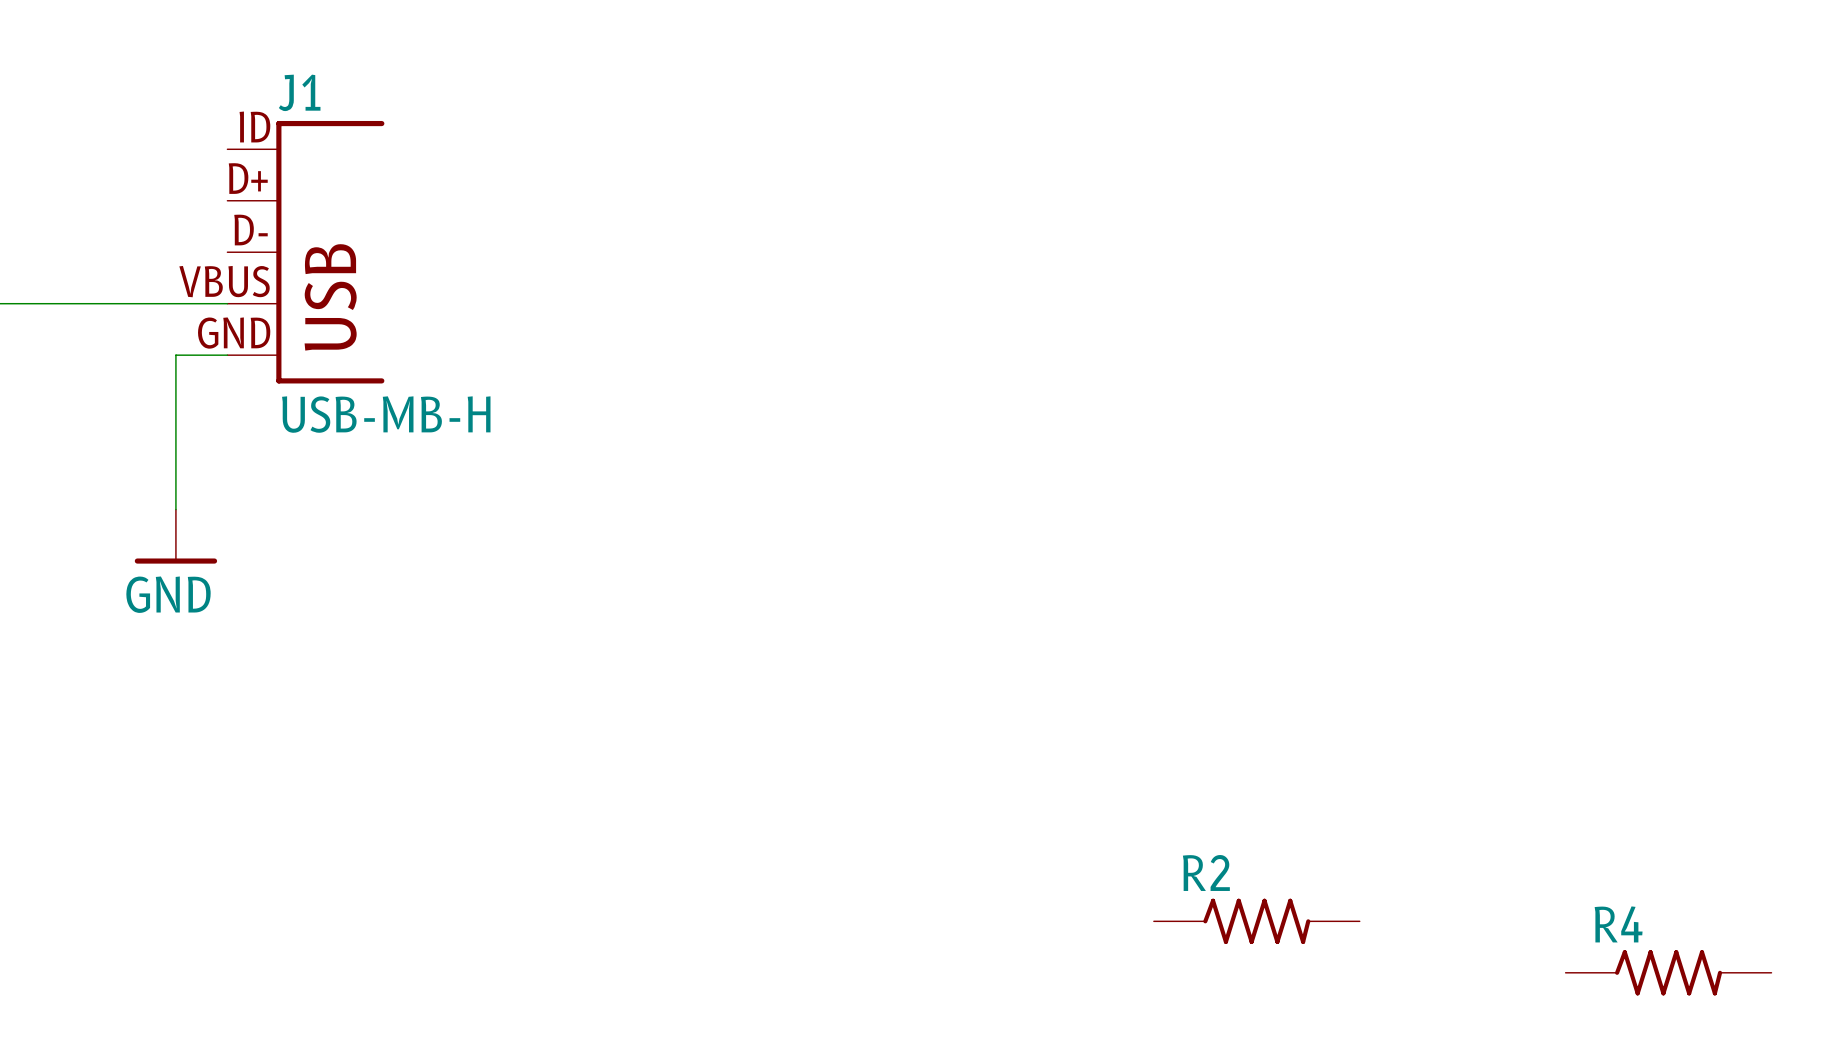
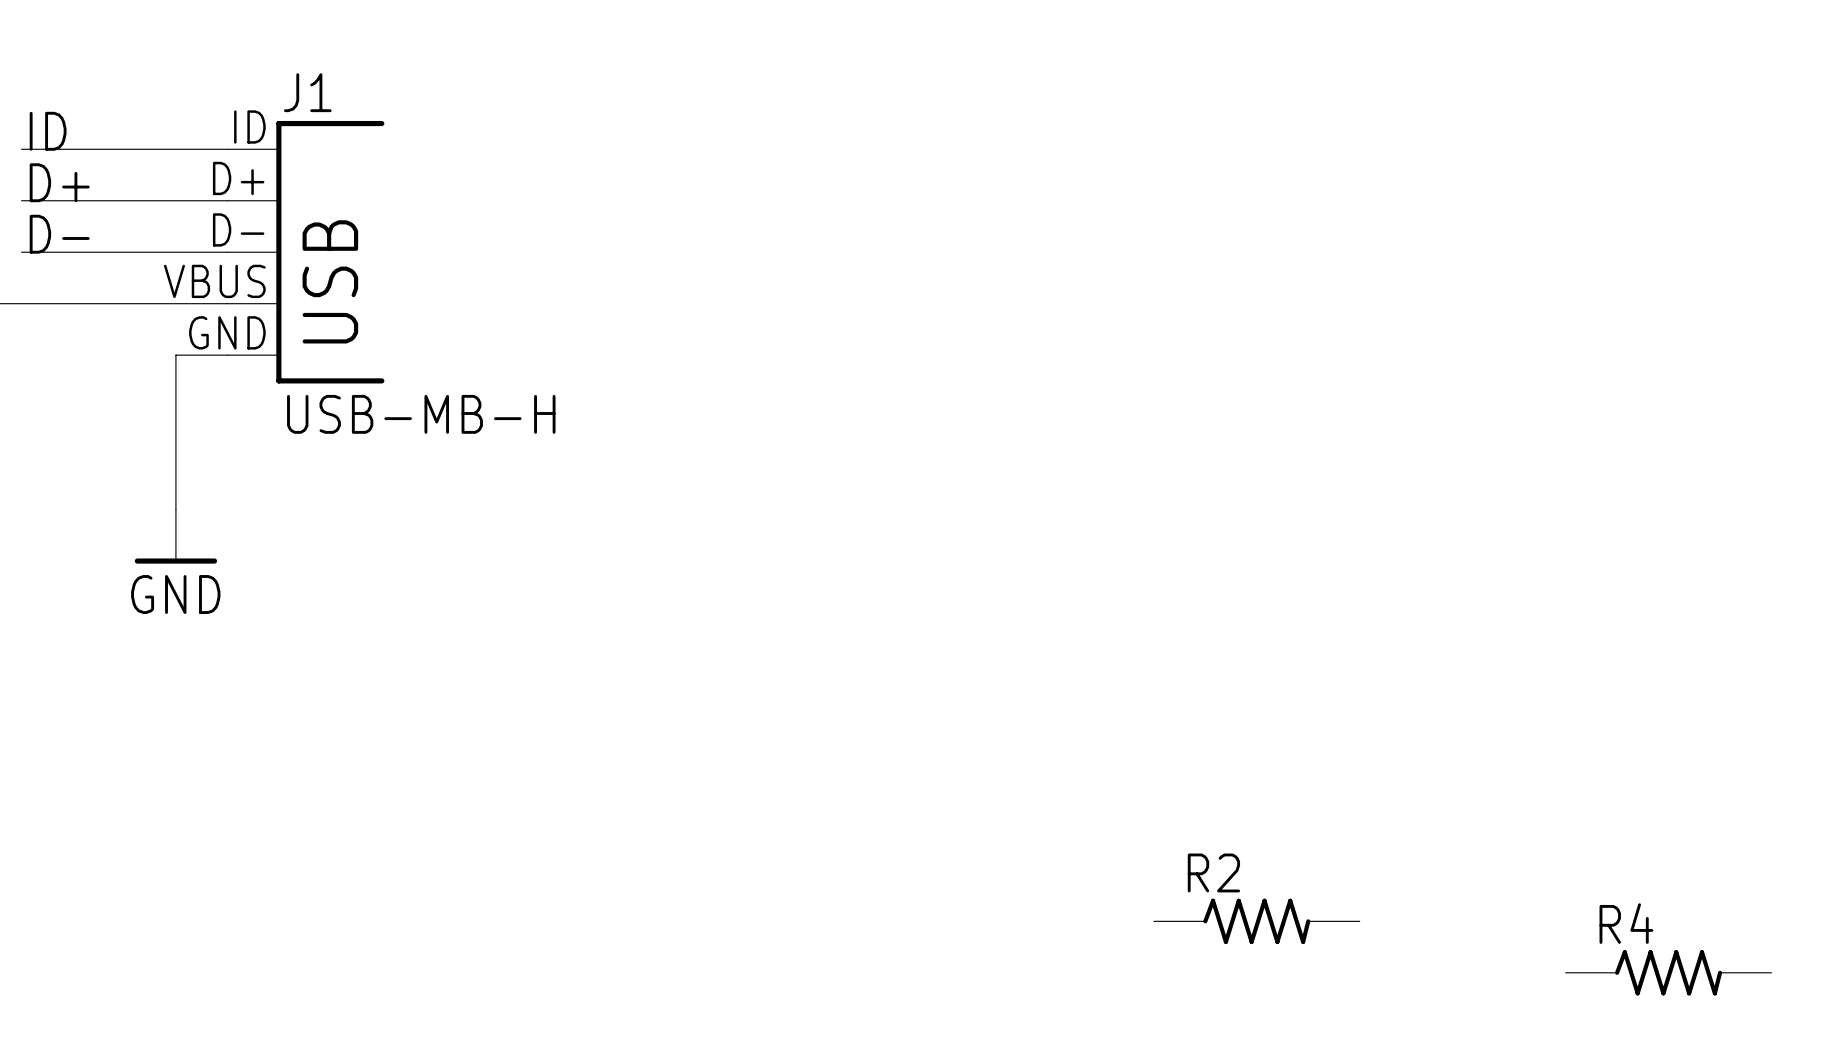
label: none -> ID (48, 131)
wire: none -> (21, 149) (227, 149)
label: none -> D+ (59, 182)
wire: none -> (21, 200) (227, 200)
label: none -> D- (59, 234)
wire: none -> (21, 252) (227, 252)

